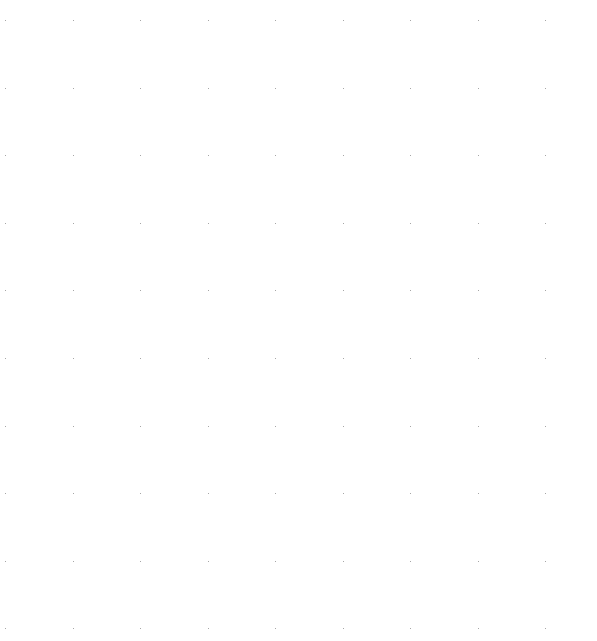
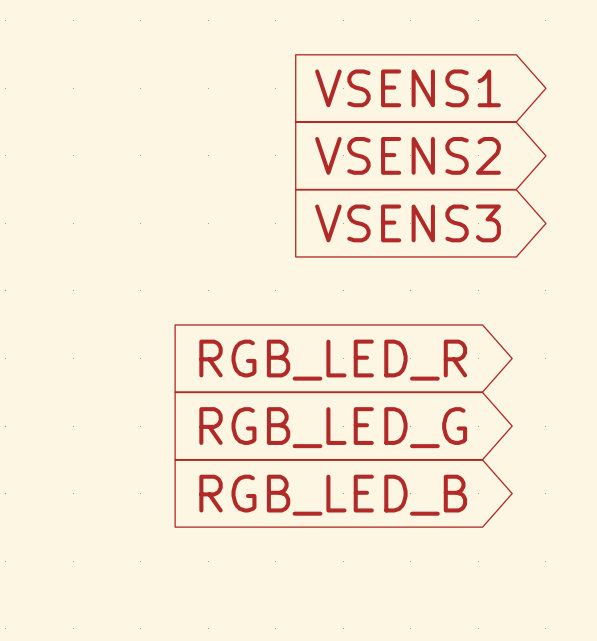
global label: none -> VSENS1 (408, 88)
global label: none -> VSENS2 (408, 155)
global label: none -> VSENS3 (408, 223)
global label: none -> RGB_LED_R (333, 360)
global label: none -> RGB_LED_G (333, 427)
global label: none -> RGB_LED_B (333, 495)

